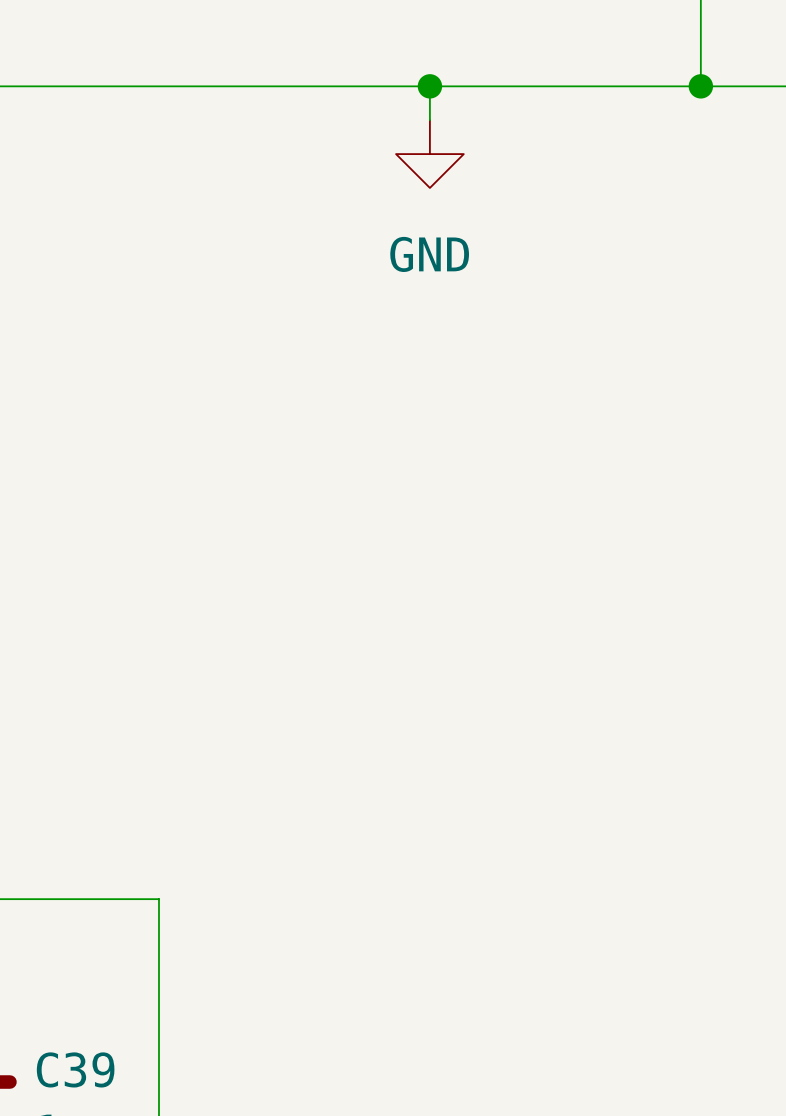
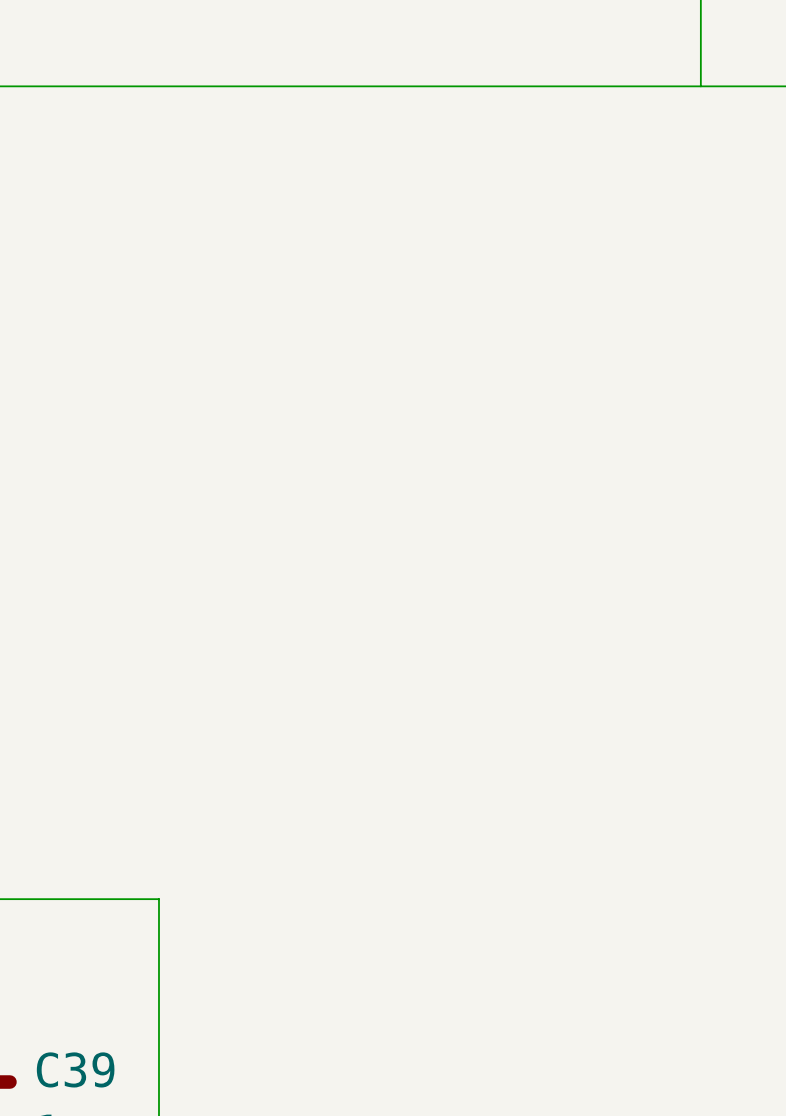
wire: (429, 86) (429, 120) -> none
junction: (429, 86) -> none
junction: (700, 86) -> none
power symbol: GND (429, 154) -> none

